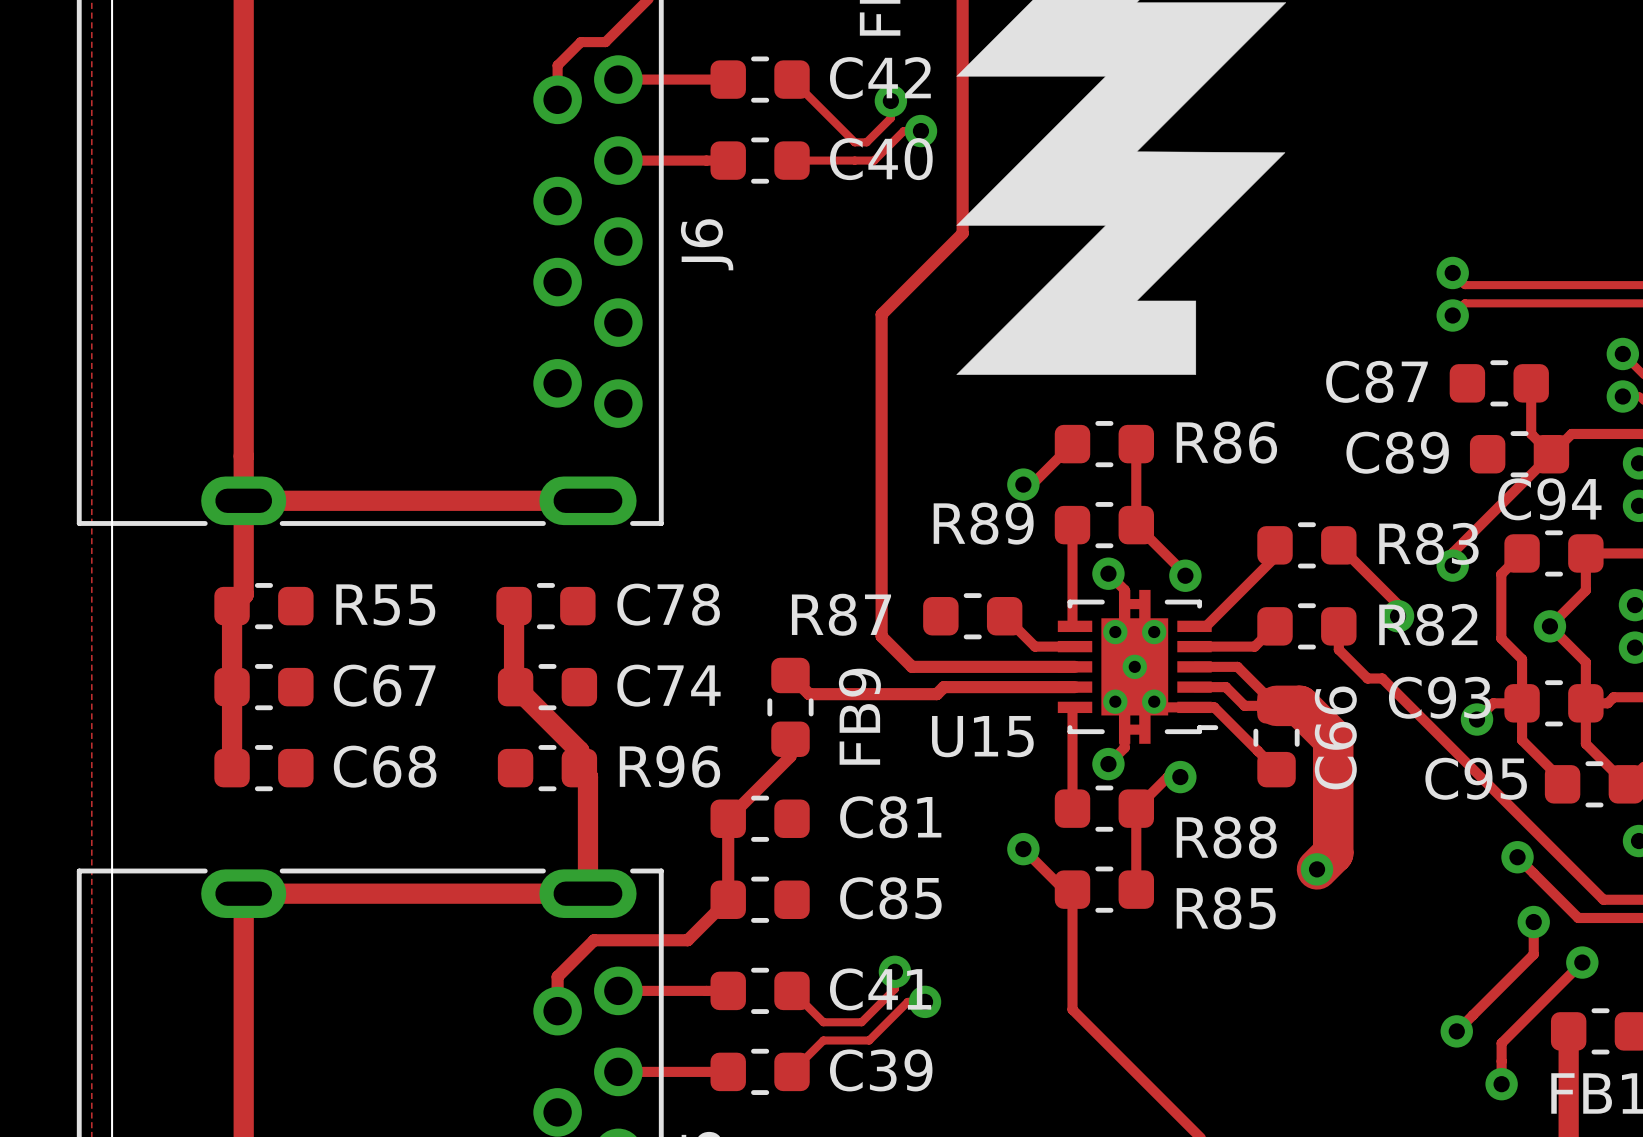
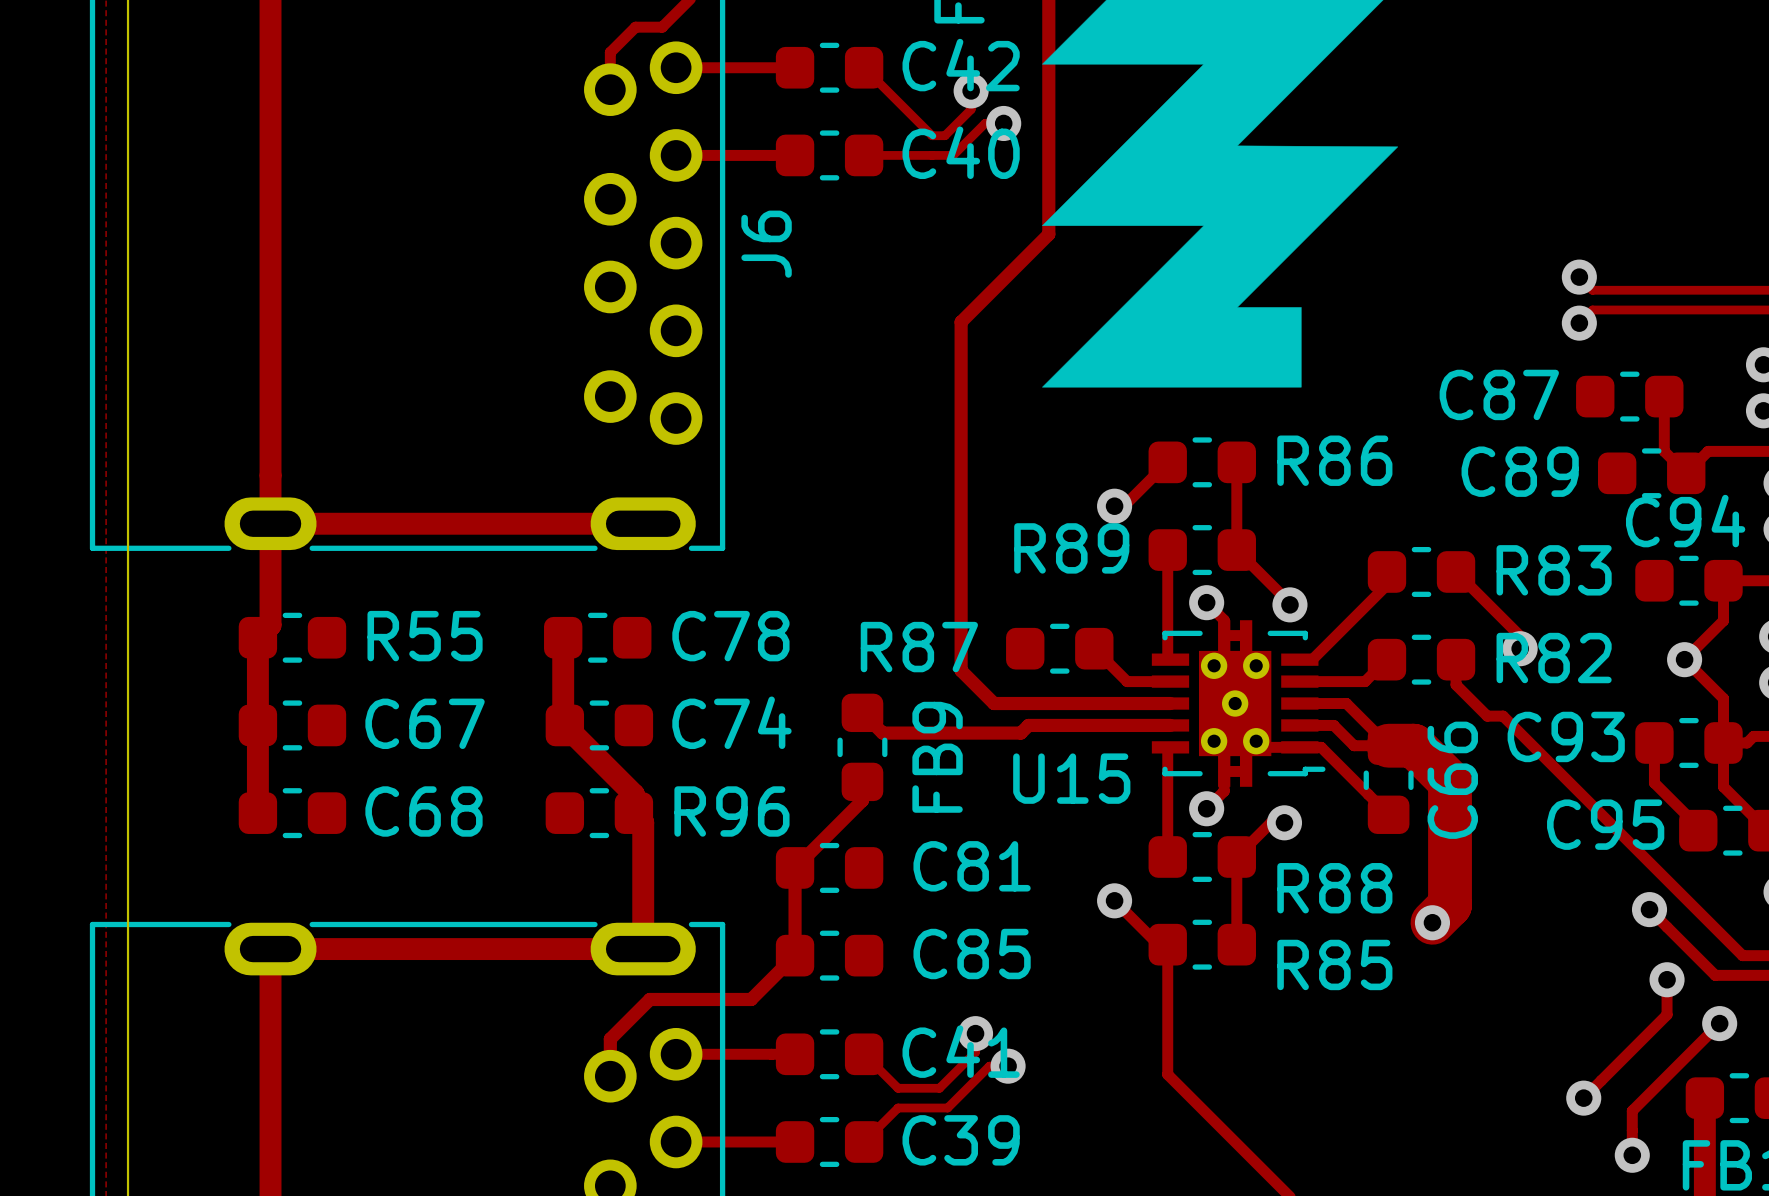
track: (1551, 454) (1452, 552) (1452, 565) -> none
track: (1522, 553) (1501, 574) (1501, 638) (1522, 659) (1522, 703) (1493, 703) (1477, 719) -> none
via: (1452, 565) -> none
via: (1477, 719) -> none

